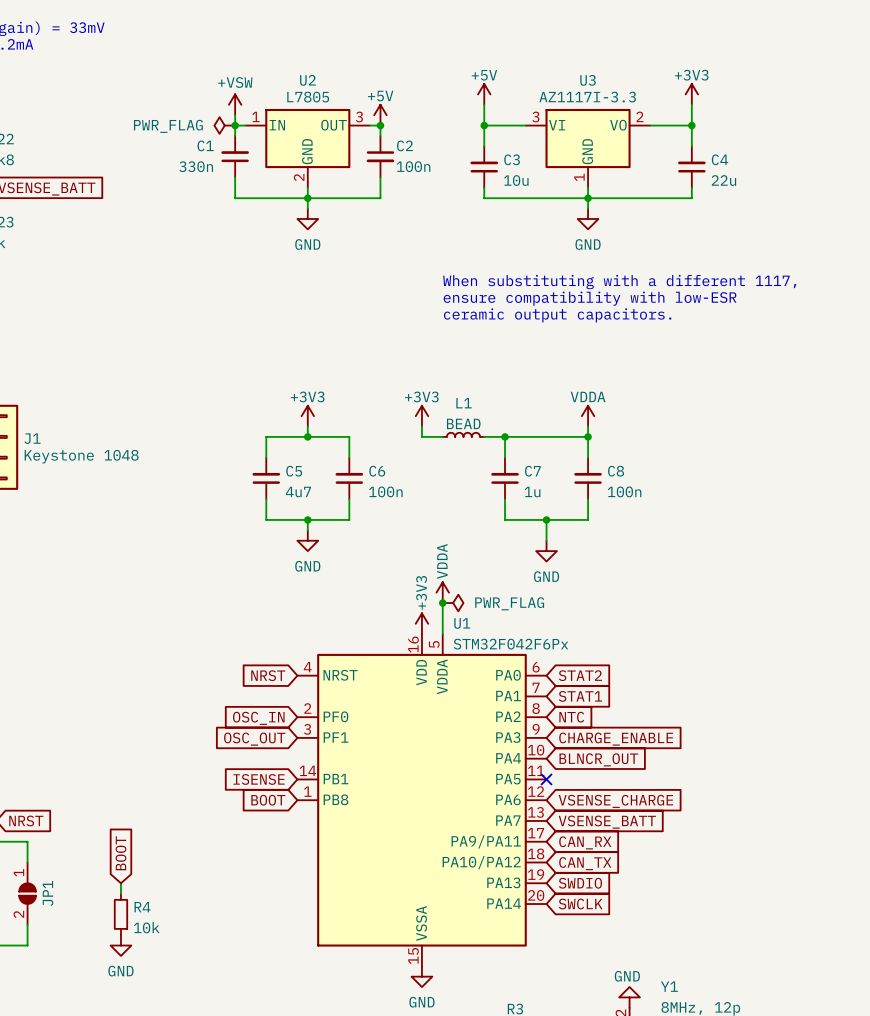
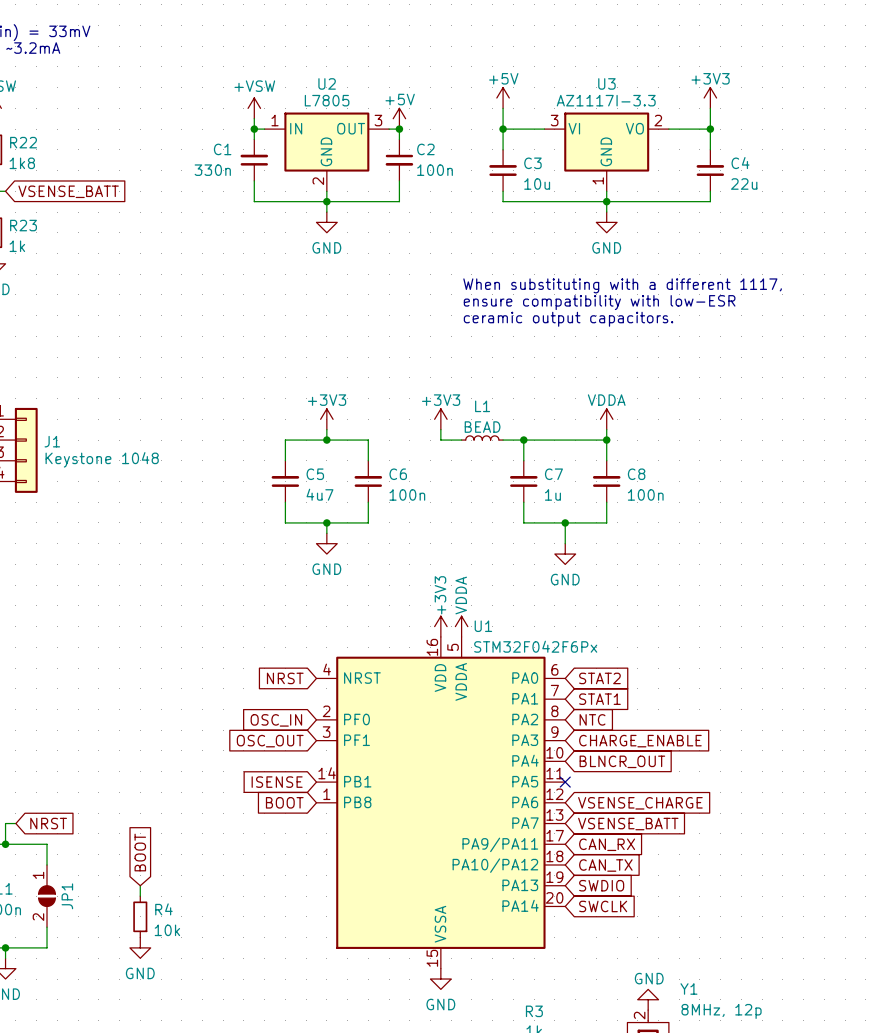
power symbol: PWR_FLAG (224, 125) -> none
power symbol position: VDDA (442, 592) -> VDDA (461, 626)
junction: (442, 603) -> none
power symbol: PWR_FLAG (453, 603) -> none

